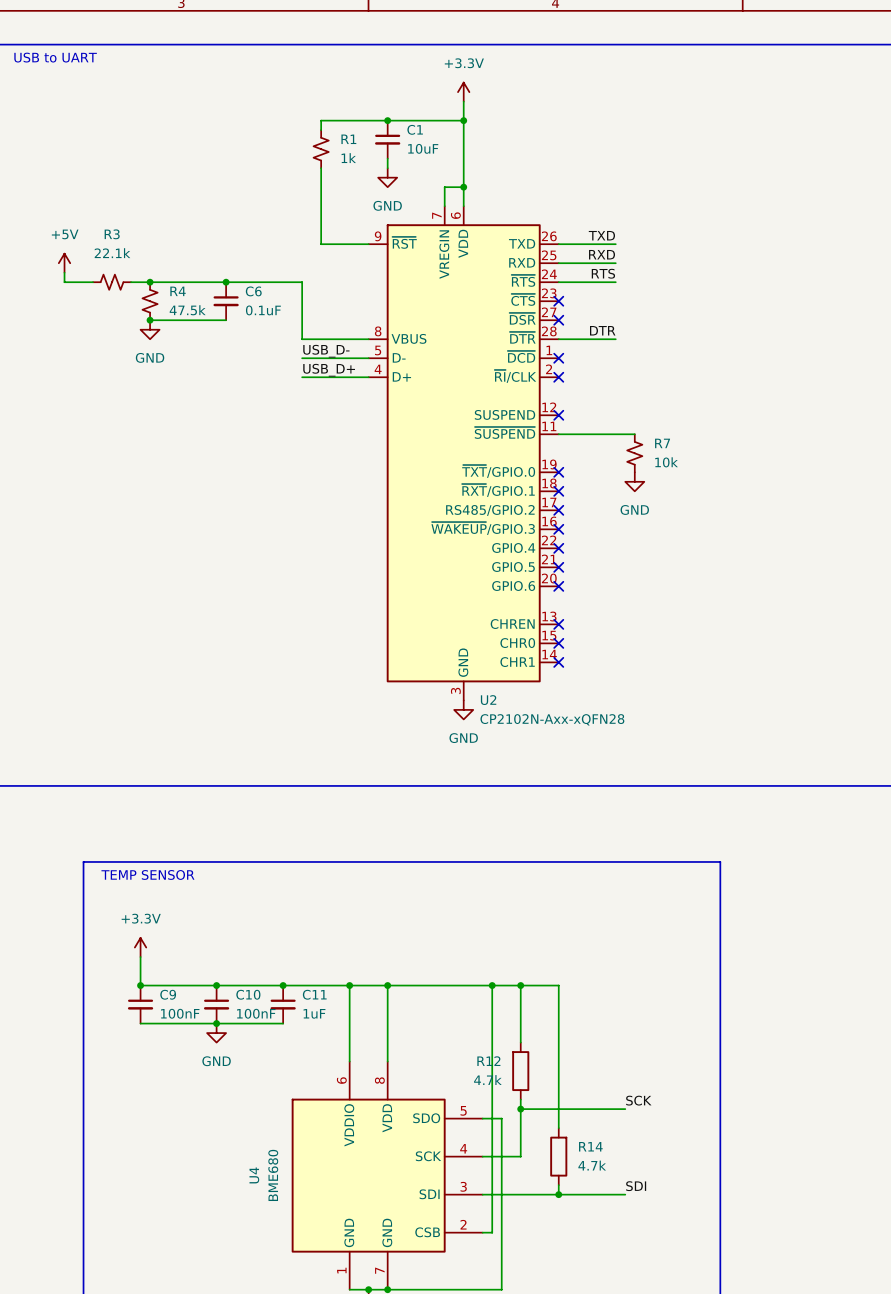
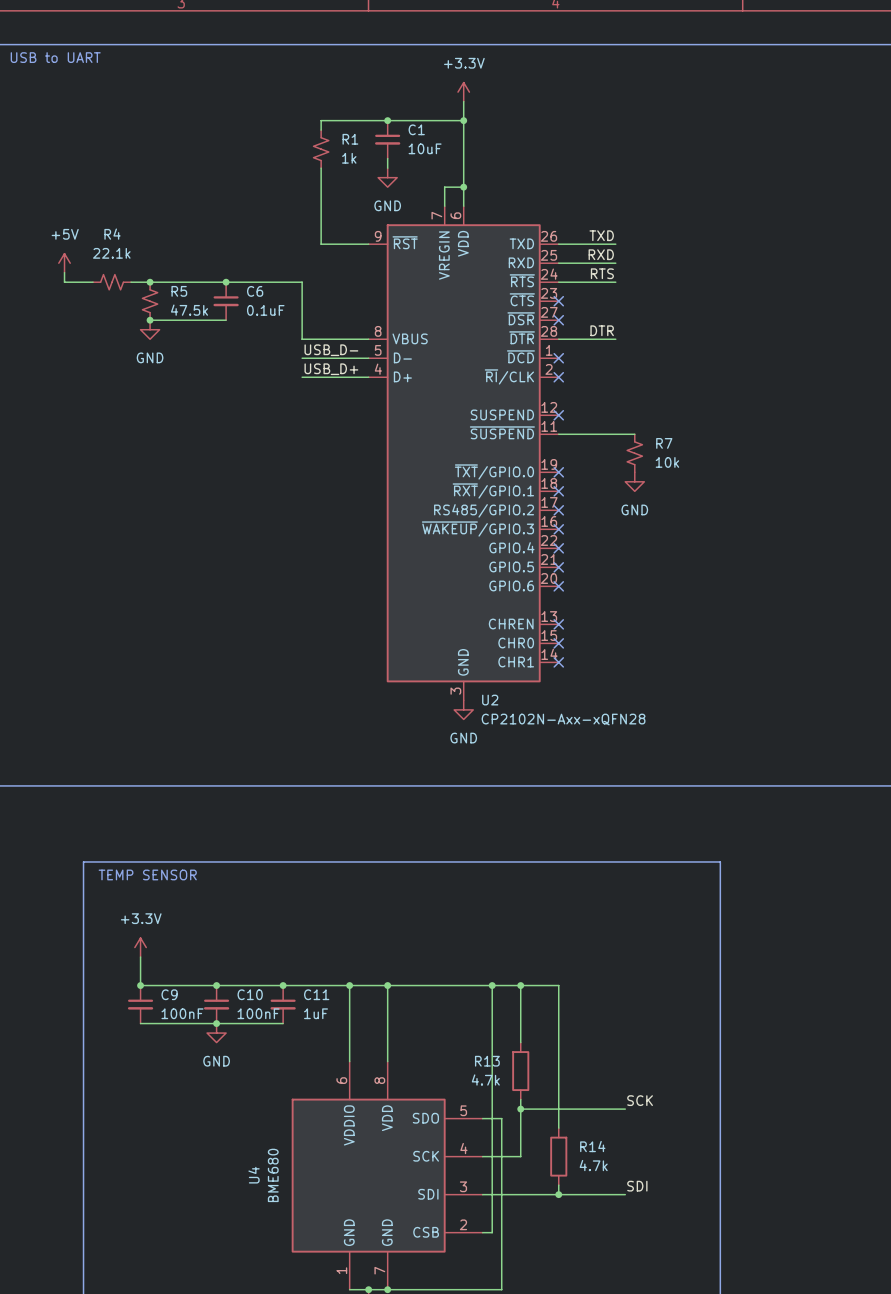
R3 name: R3 (112, 234) -> R4 (112, 234)
R4 name: R4 (178, 291) -> R5 (179, 291)
R12 name: R12 (488, 1061) -> R13 (487, 1061)

